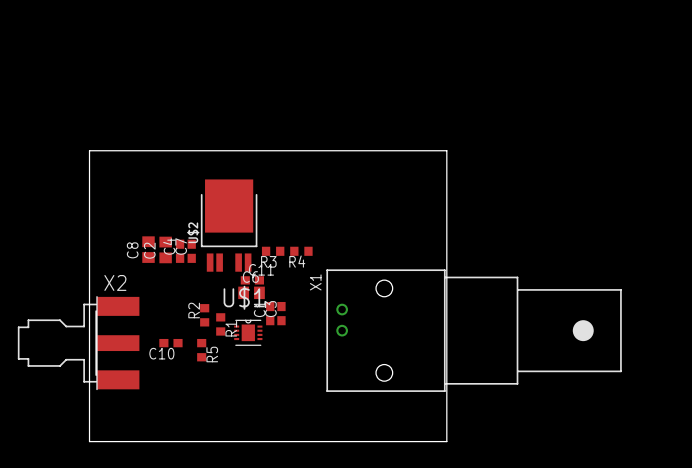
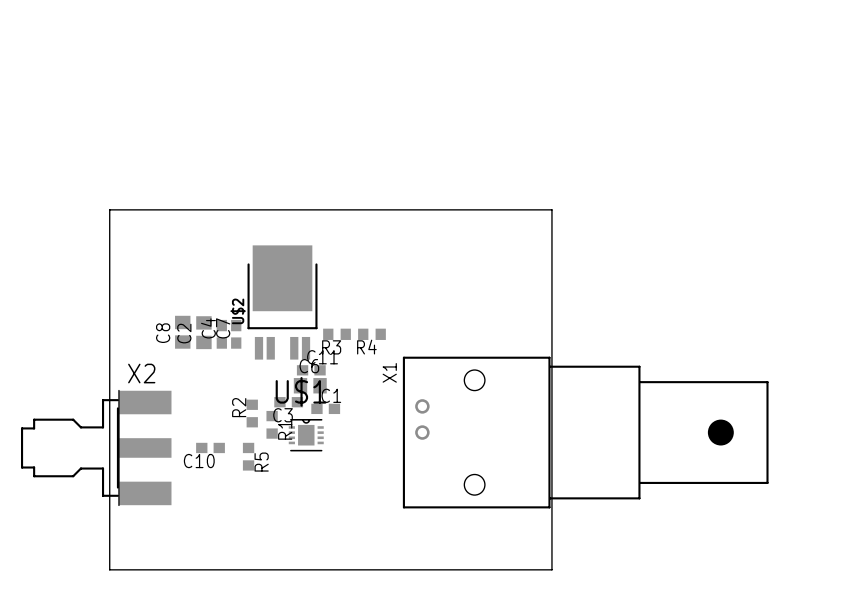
C3 name position: C3 (270, 309) -> C3 (283, 415)
C1 rotation: 0° (270, 313) -> 90° clockwise (325, 408)
C3 rotation: 0° (281, 313) -> 90° clockwise (288, 402)
C3 position: (281, 313) -> (288, 402)

